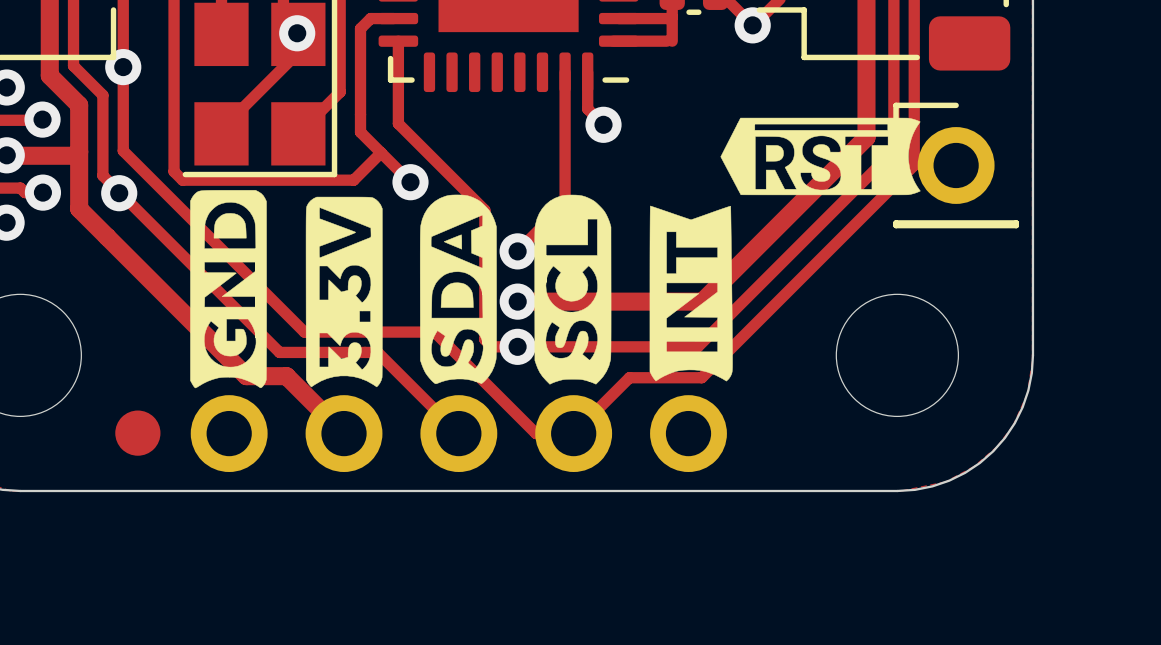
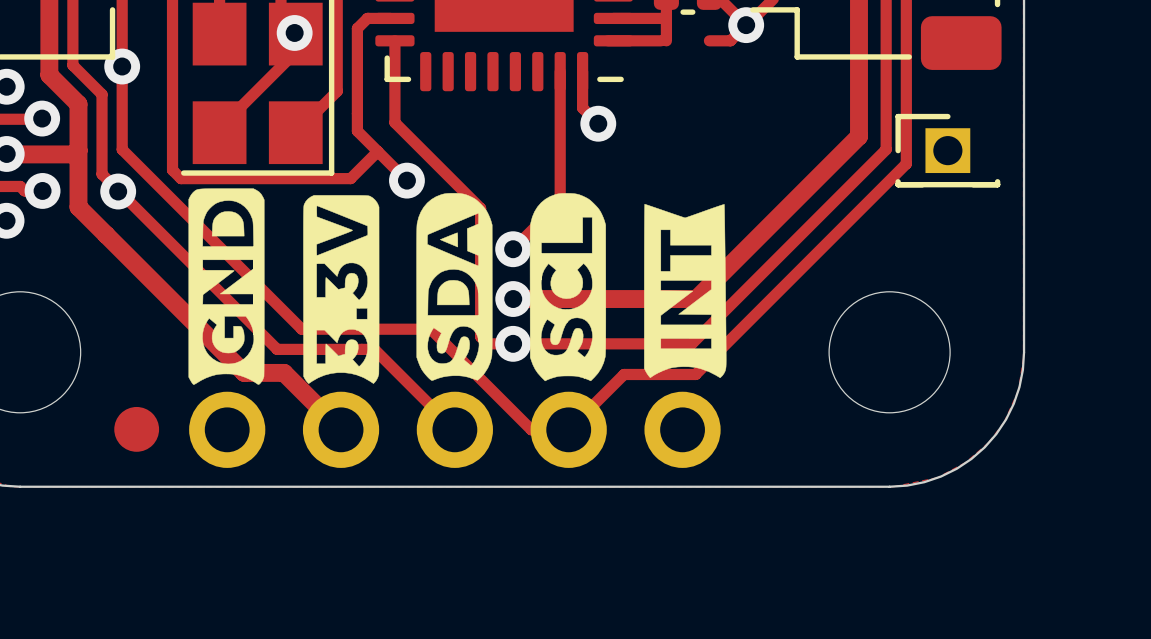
track: none -> (746, 25) (730, 40) (709, 40)
part footprint: [893, 102, 1019, 229] -> [895, 113, 1001, 188]
drawing: [720, 117, 921, 196] -> none

